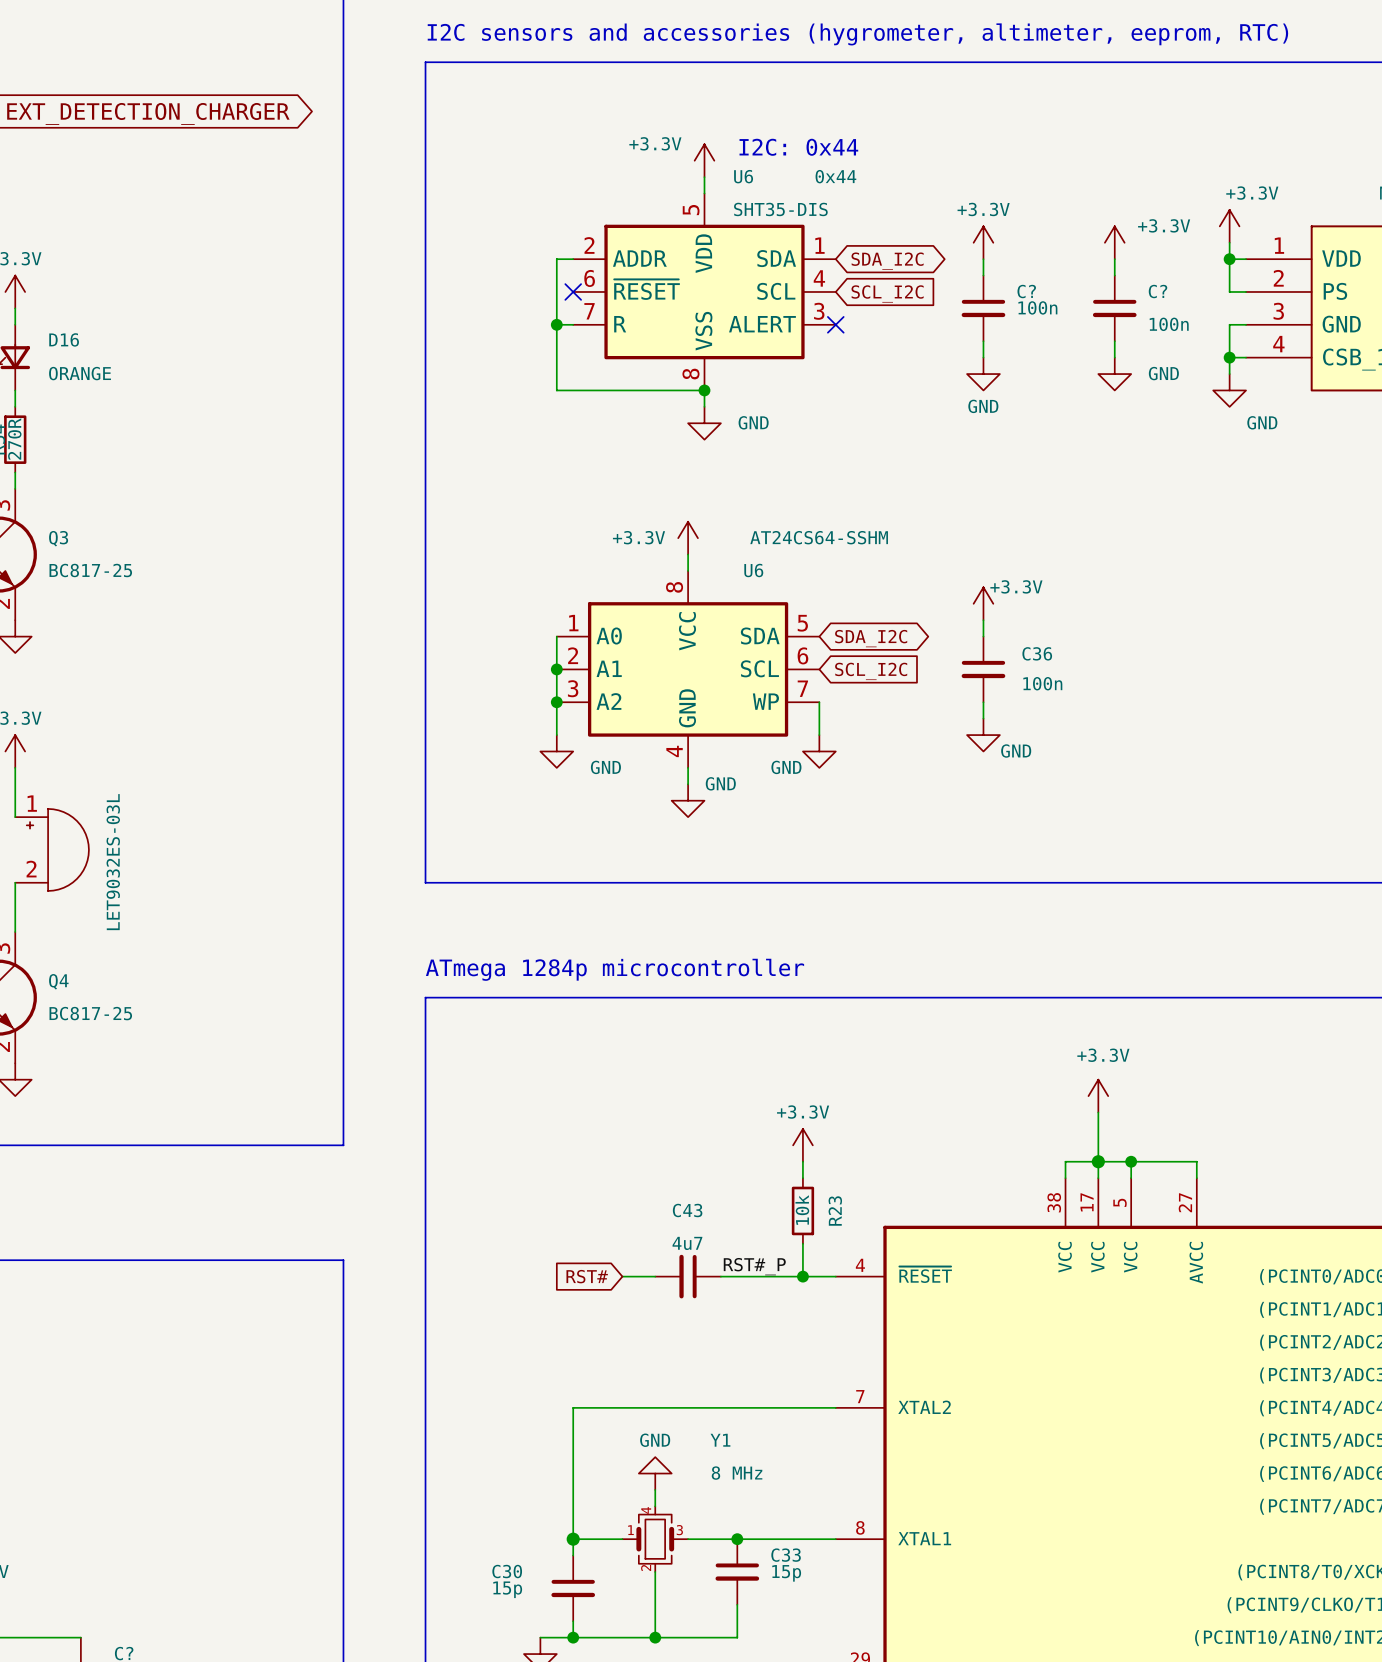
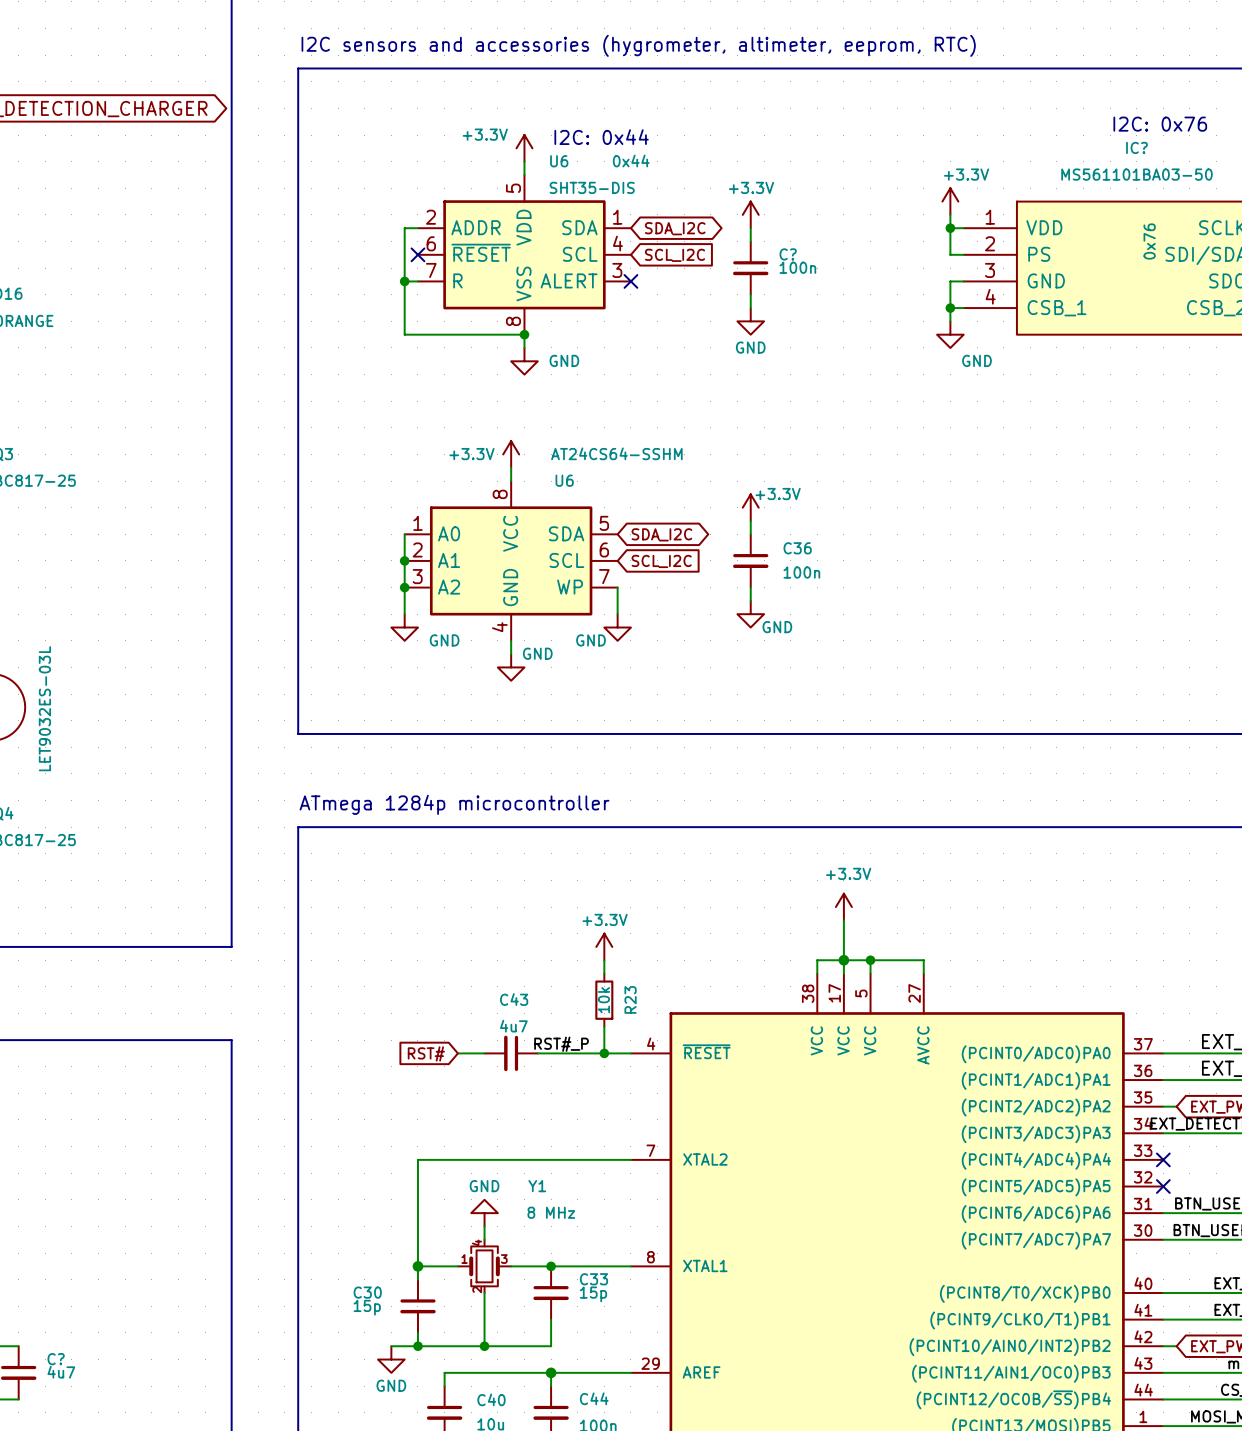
power symbol: +3.3V (1114, 242) -> none
wire: (1114, 259) (1114, 275) -> none
C?: 100n (1114, 308) -> none
wire: (1114, 341) (1114, 357) -> none
power symbol: GND (1114, 374) -> none

